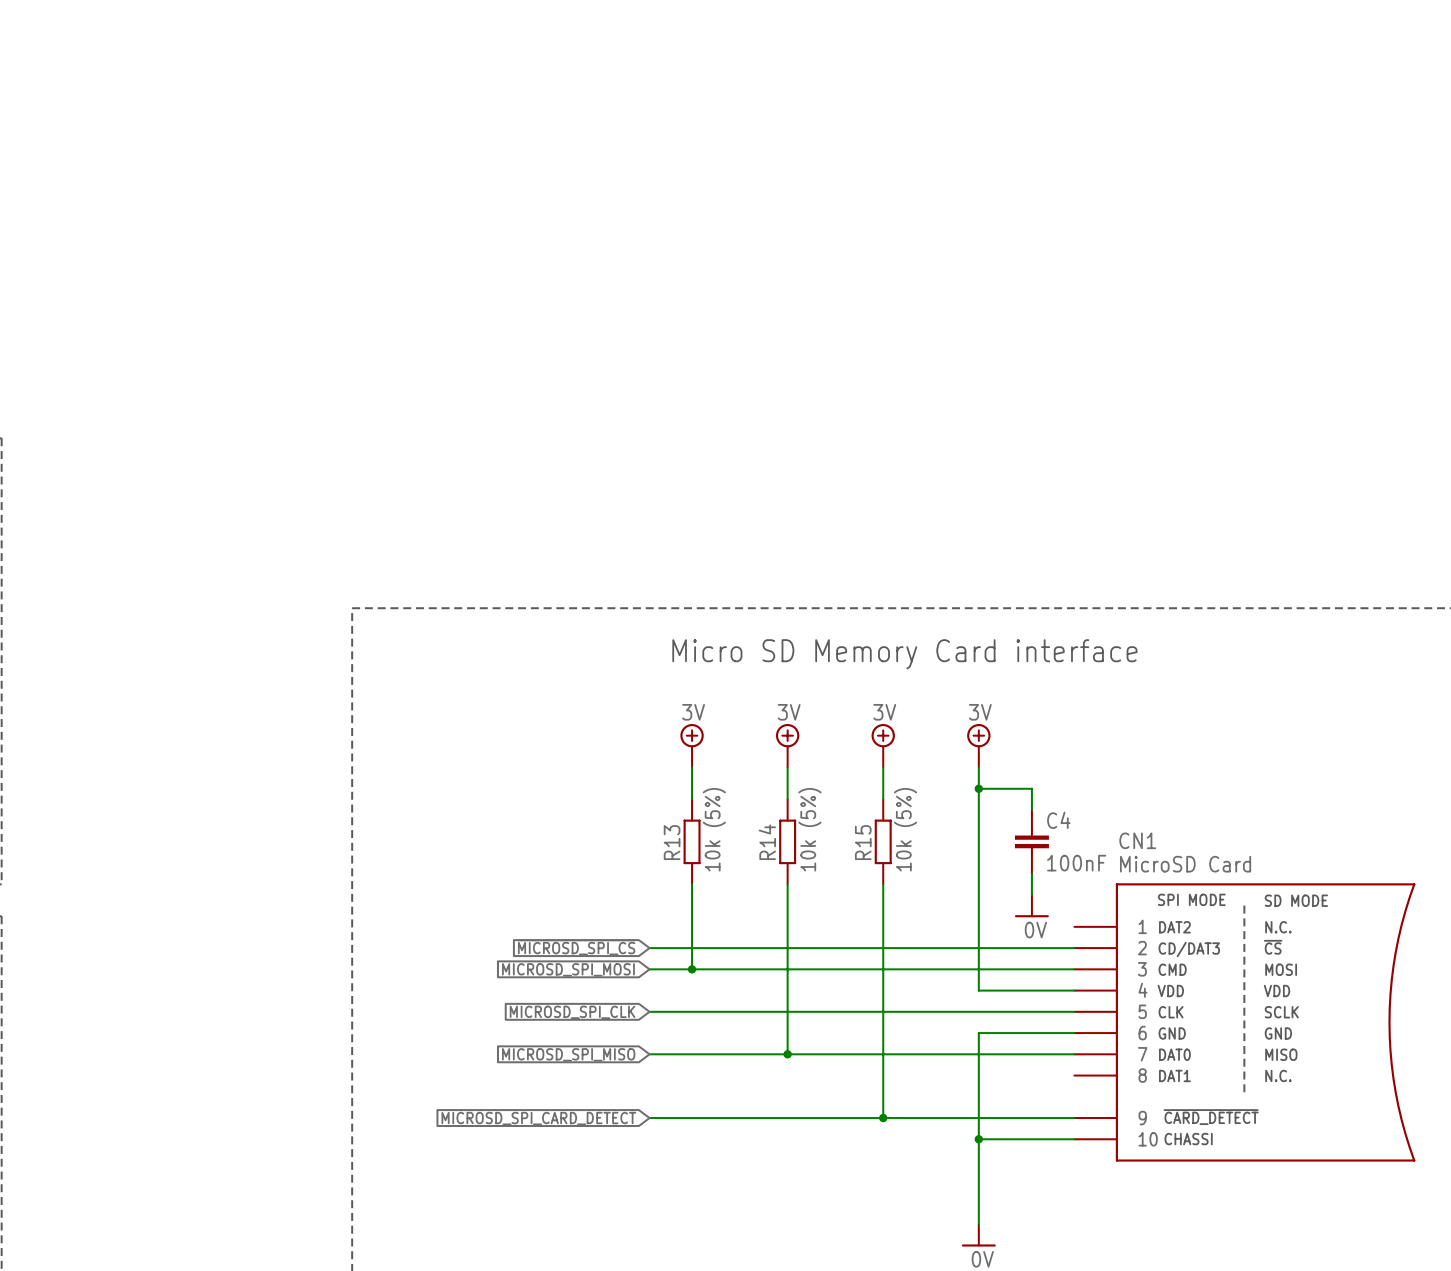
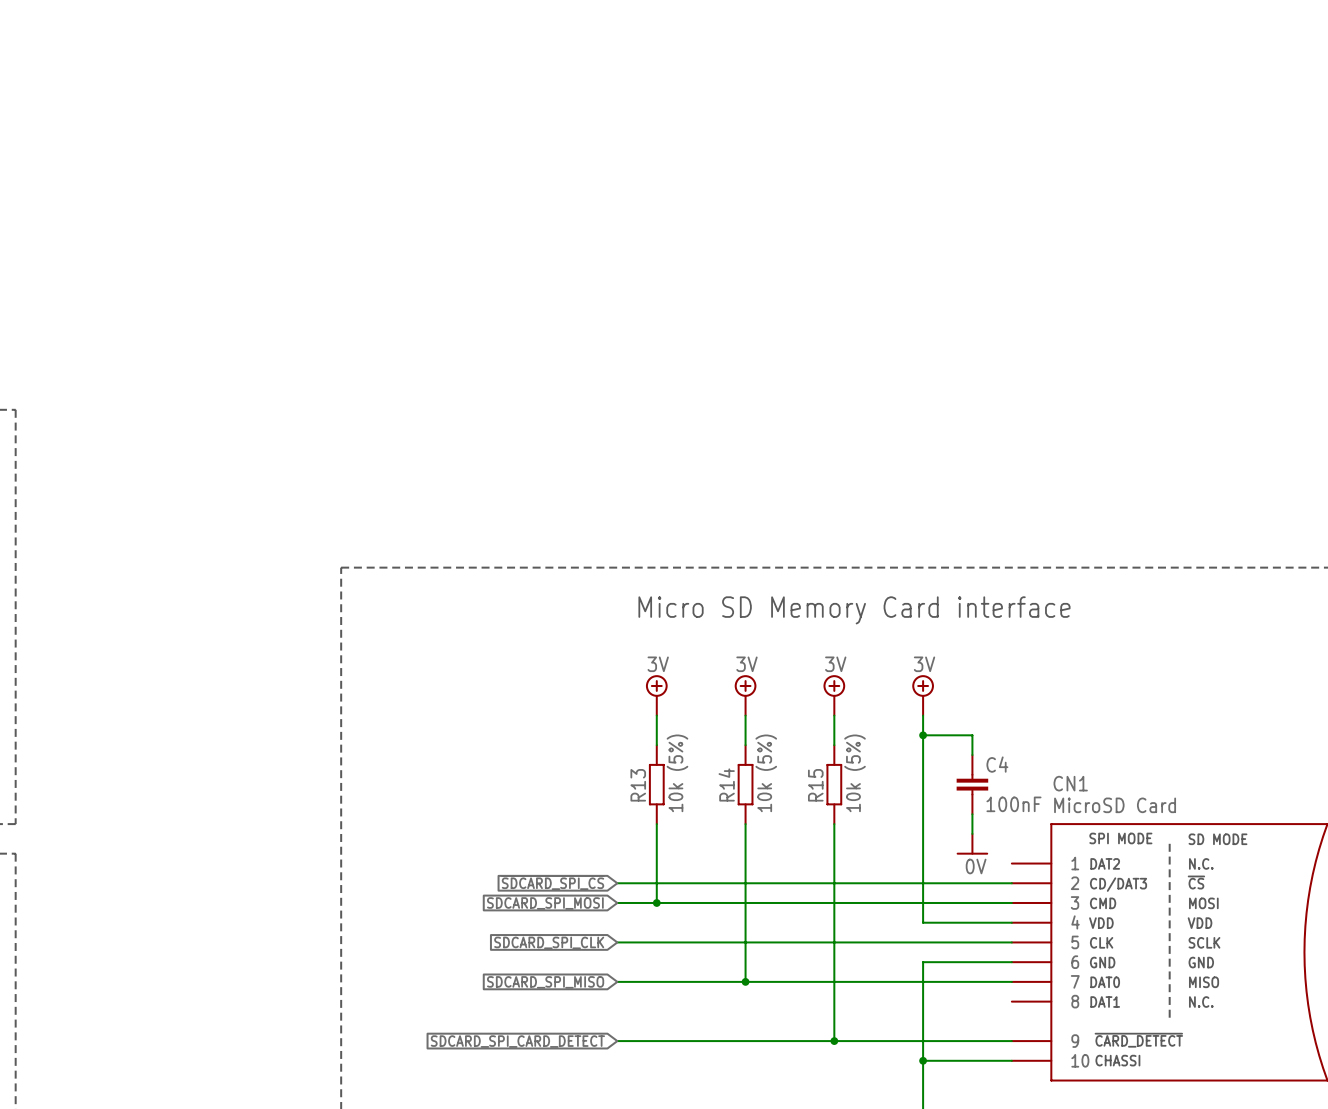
global label: ~{MICROSD_SPI_CS} (576, 947) -> ~{SDCARD_SPI_CS} (552, 882)
global label: MICROSD_SPI_MOSI (568, 969) -> SDCARD_SPI_MOSI (545, 903)
global label: MICROSD_SPI_CLK (572, 1012) -> SDCARD_SPI_CLK (549, 942)
global label: MICROSD_SPI_MISO (568, 1054) -> SDCARD_SPI_MISO (545, 982)
global label: MICROSD_SPI_CARD_DETECT (538, 1118) -> SDCARD_SPI_CARD_DETECT (517, 1041)

